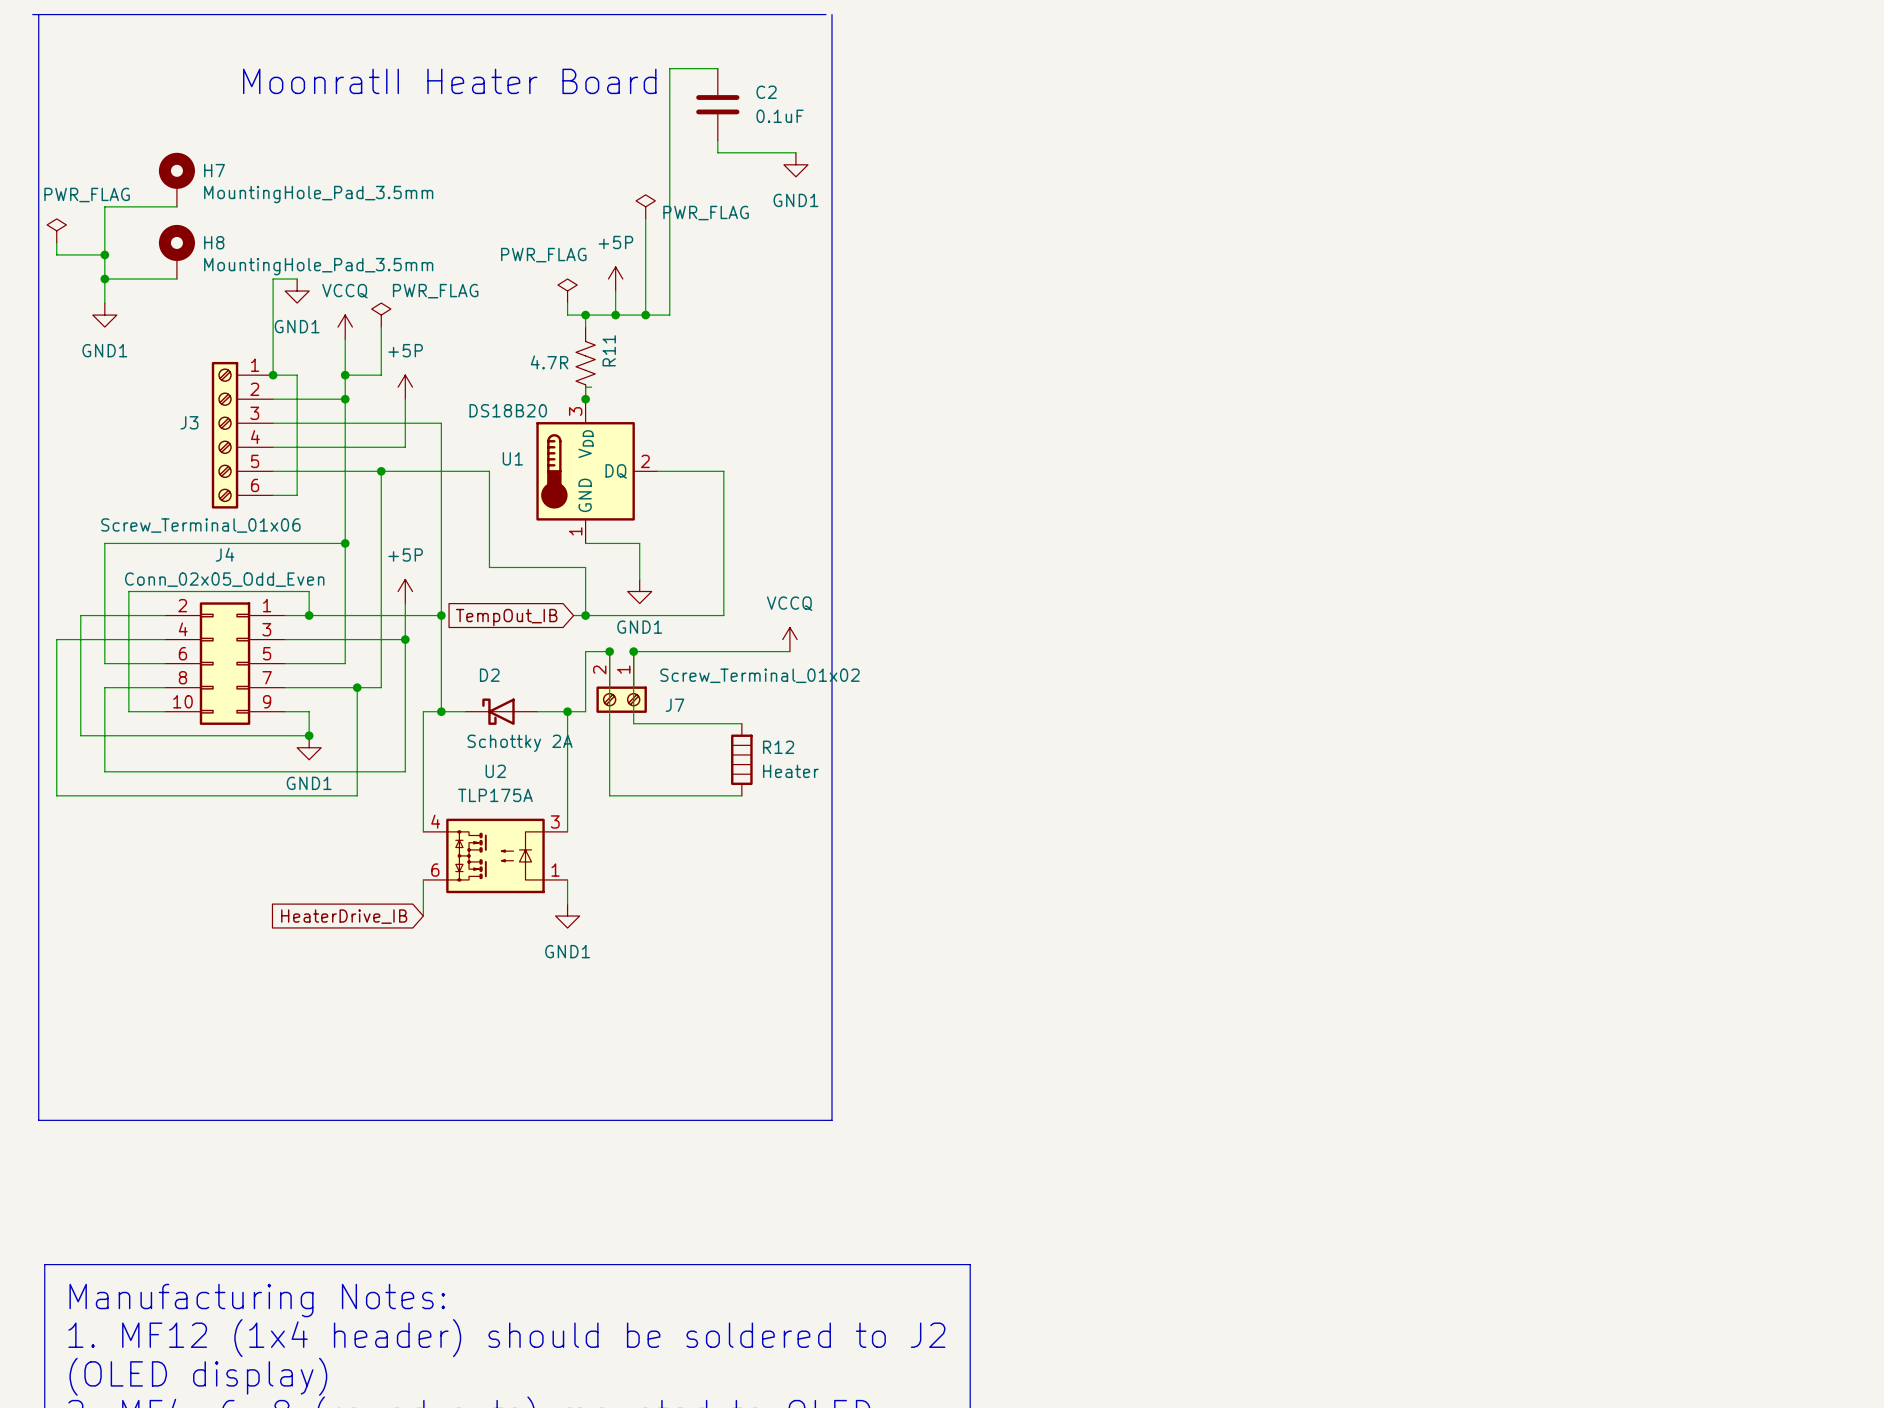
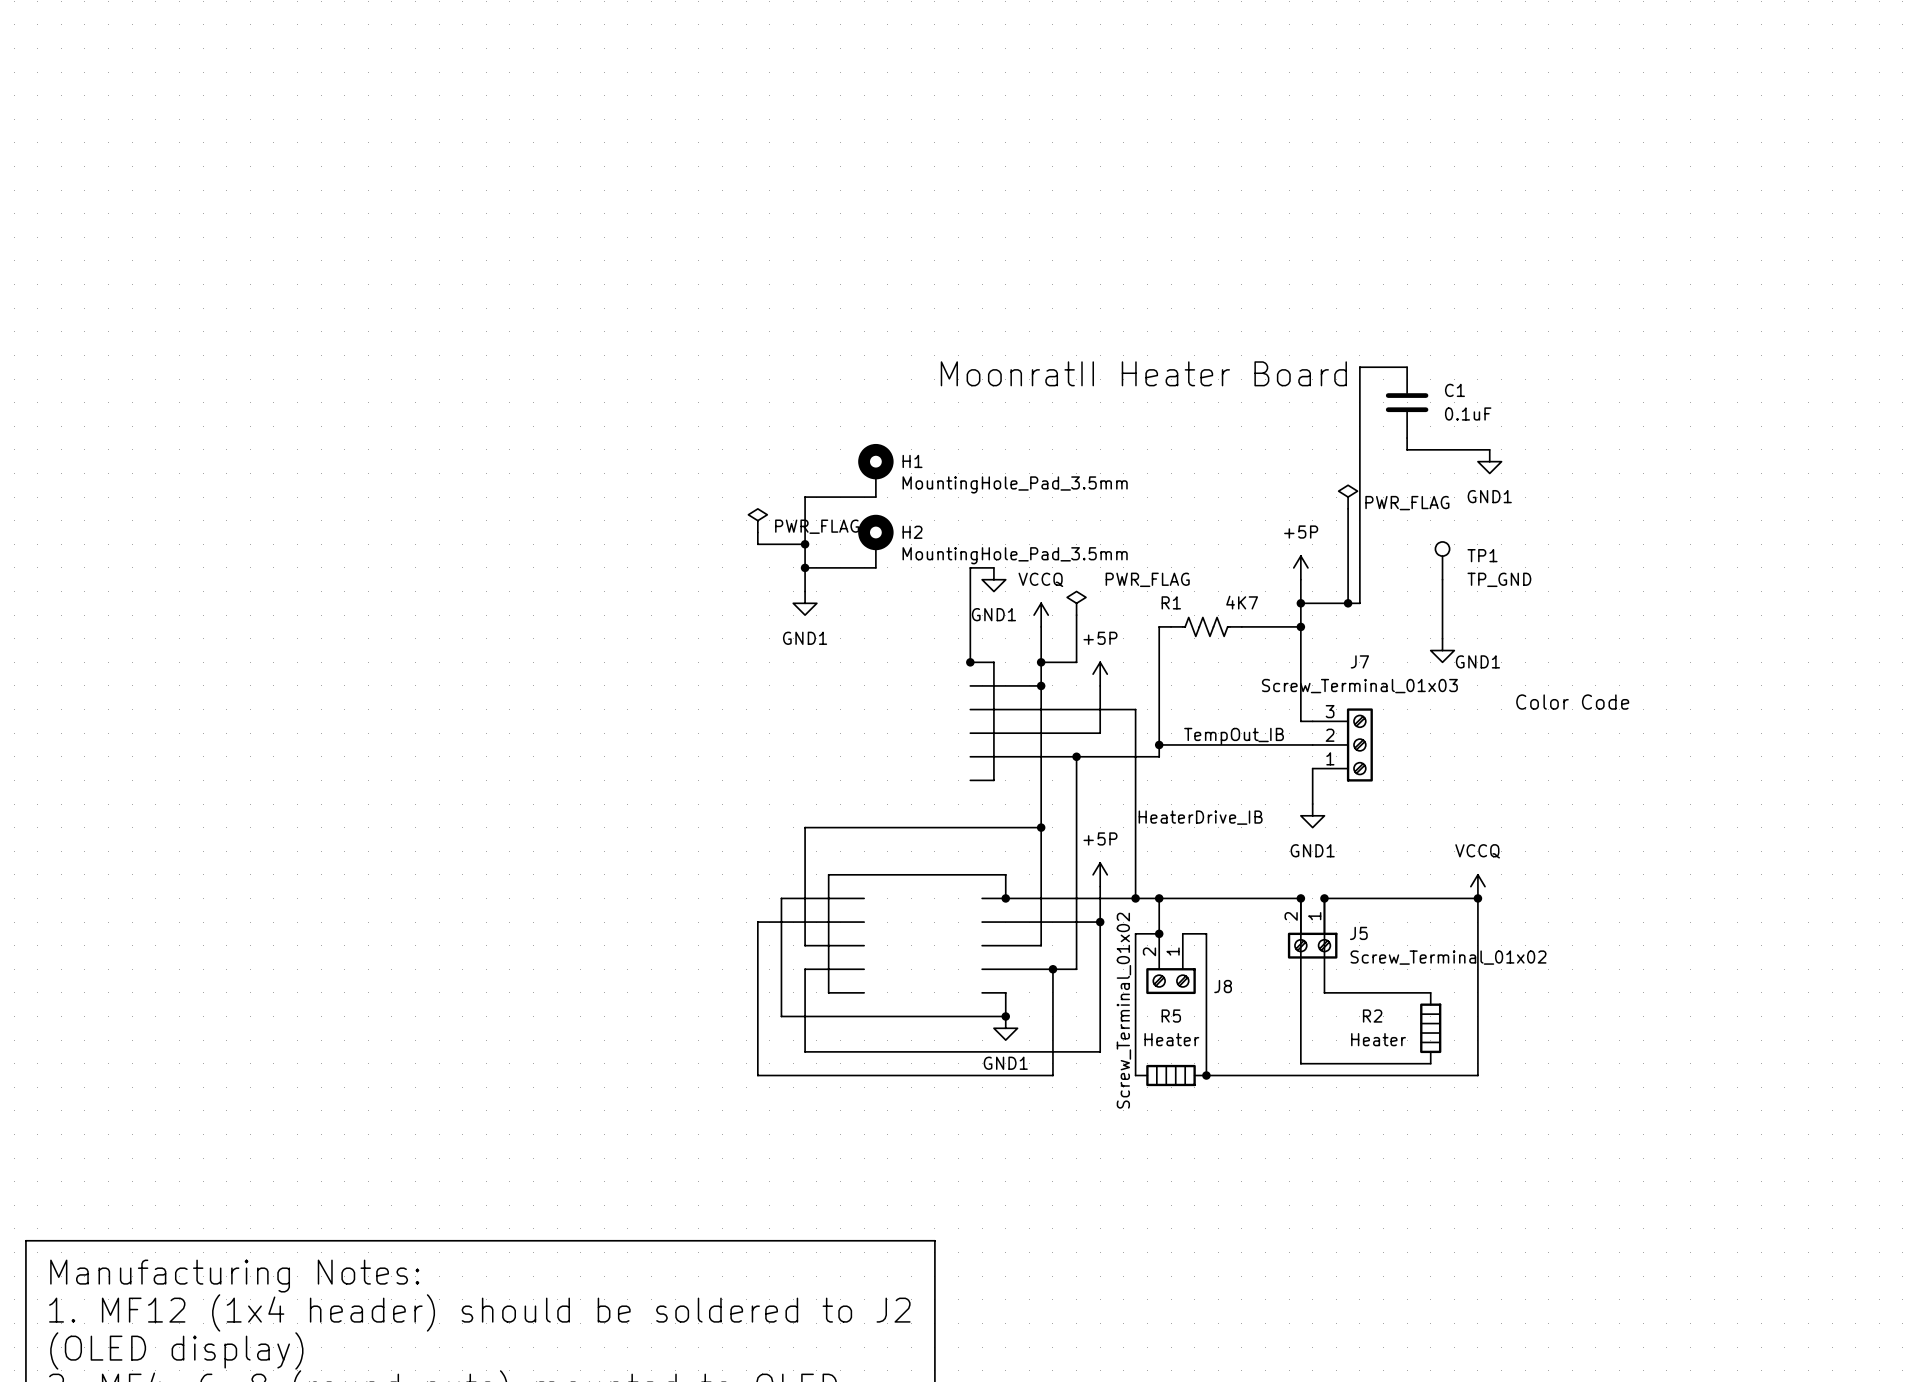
line: (32, 14) (825, 14) -> none
line: (38, 14) (38, 1120) (832, 1120) (832, 14) -> none
wire: (717, 68) (669, 68) (669, 315) (567, 315) (567, 303) -> none
text: MoonratII Heater Board (449, 81) -> none
C2: 0.1uF (717, 104) -> none
wire: (717, 140) (717, 152) (795, 152) -> none
power symbol: GND1 (795, 164) -> none
H7: MountingHole_Pad_3.5mm (176, 179) -> none
wire: (176, 206) (104, 206) (104, 303) -> none
power symbol: PWR_FLAG (645, 206) -> none
wire: (645, 218) (645, 315) -> none
power symbol: PWR_FLAG (56, 230) -> none
wire: (56, 242) (56, 254) (104, 254) -> none
H8: MountingHole_Pad_3.5mm (176, 251) -> none
junction: (104, 254) -> none
wire: (104, 279) (176, 279) -> none
junction: (104, 279) -> none
wire: (297, 279) (273, 279) (273, 375) (297, 375) (297, 495) (273, 495) -> none
power symbol: +5P (615, 279) -> none
power symbol: GND1 (297, 291) -> none
power symbol: PWR_FLAG (567, 291) -> none
wire: (615, 291) (615, 315) -> none
power symbol: GND1 (104, 315) -> none
power symbol: PWR_FLAG (381, 315) -> none
wire: (585, 315) (585, 327) -> none
junction: (585, 315) -> none
junction: (615, 315) -> none
junction: (645, 315) -> none
power symbol: VCCQ (345, 327) -> none
wire: (381, 327) (381, 375) (345, 375) -> none
wire: (345, 339) (345, 663) (285, 663) -> none
R11: 4.7R (585, 363) -> none
junction: (273, 375) -> none
junction: (345, 375) -> none
wire: none -> (1407, 367) (1359, 367) (1359, 603) (1300, 603)
text: none -> MoonratII Heater Board (1143, 373)
power symbol: +5P (405, 387) -> none
wire: (591, 387) (585, 387) (585, 399) -> none
wire: (273, 399) (345, 399) -> none
junction: (345, 399) -> none
wire: (405, 399) (405, 447) (273, 447) -> none
junction: (585, 399) -> none
C1: none -> 0.1uF (1407, 402)
wire: (273, 423) (441, 423) (441, 711) -> none
J3: Screw_Terminal_01x06 (242, 435) -> none
wire: none -> (1407, 438) (1407, 449) (1489, 449)
wire: (273, 471) (489, 471) (489, 567) (585, 567) (585, 615) -> none
wire: (381, 471) (381, 687) (285, 687) -> none
junction: (381, 471) -> none
U1: DS18B20 (597, 471) -> none
wire: (657, 471) (723, 471) (723, 615) (573, 615) -> none
power symbol: none -> GND1 (1489, 461)
H1: none -> MountingHole_Pad_3.5mm (875, 470)
wire: none -> (875, 497) (805, 497) (805, 591)
power symbol: none -> PWR_FLAG (1348, 497)
wire: none -> (1348, 508) (1348, 603)
power symbol: none -> PWR_FLAG (757, 520)
wire: (345, 543) (104, 543) (104, 663) (164, 663) -> none
junction: (345, 543) -> none
wire: (585, 543) (639, 543) (639, 579) -> none
wire: none -> (757, 532) (757, 544) (805, 544)
H2: none -> MountingHole_Pad_3.5mm (875, 541)
junction: none -> (805, 544)
TP1: none -> TP_GND (1442, 560)
wire: none -> (805, 567) (875, 567)
junction: none -> (805, 567)
wire: none -> (993, 567) (970, 567) (970, 662) (993, 662) (993, 780) (970, 780)
power symbol: none -> +5P (1300, 567)
power symbol: +5P (405, 591) -> none
power symbol: GND1 (639, 591) -> none
power symbol: none -> GND1 (993, 579)
wire: none -> (1300, 579) (1300, 721) (1312, 721)
wire: none -> (1442, 579) (1442, 638)
wire: (405, 603) (405, 771) (104, 771) (104, 687) (164, 687) -> none
wire: (164, 615) (80, 615) (80, 735) (309, 735) (309, 711) (285, 711) -> none
wire: (285, 615) (441, 615) -> none
wire: (309, 615) (309, 591) (128, 591) (128, 711) (164, 711) -> none
junction: (309, 615) -> none
junction: (441, 615) -> none
junction: (585, 615) -> none
power symbol: none -> GND1 (805, 603)
power symbol: none -> PWR_FLAG (1076, 603)
junction: none -> (1300, 603)
junction: none -> (1348, 603)
global label: TempOut_IB (506, 617) -> none
power symbol: none -> VCCQ (1041, 615)
wire: none -> (1076, 615) (1076, 662) (1041, 662)
wire: (164, 639) (56, 639) (56, 795) (357, 795) (357, 687) -> none
wire: (285, 639) (405, 639) -> none
junction: (405, 639) -> none
power symbol: VCCQ (789, 639) -> none
wire: none -> (1041, 626) (1041, 945) (982, 945)
wire: none -> (1171, 626) (1159, 626) (1159, 756) (970, 756)
R1: none -> 4K7 (1206, 626)
wire: none -> (1241, 626) (1300, 626)
junction: none -> (1300, 626)
J7 symbol: [596, 651, 647, 713] -> [1312, 708, 1373, 782]
junction: (609, 651) -> none
junction: (633, 651) -> none
wire: (789, 651) (633, 651) (633, 723) (741, 723) -> none
J4: Conn_02x05_Odd_Even (225, 663) -> none
power symbol: none -> GND1 (1442, 650)
J7 value: Screw_Terminal_01x02 (759, 675) -> Screw_Terminal_01x03 (1359, 686)
junction: none -> (970, 662)
junction: none -> (1041, 662)
junction: (357, 687) -> none
power symbol: none -> +5P (1100, 674)
wire: none -> (970, 685) (1041, 685)
junction: none -> (1041, 685)
wire: none -> (1100, 685) (1100, 733) (970, 733)
J7 name position: J7 (674, 705) -> J7 (1359, 661)
junction: (441, 711) -> none
wire: (465, 711) (423, 711) (423, 831) -> none
D2: Schottky 2A (501, 711) -> none
wire: (537, 711) (585, 711) (585, 651) (609, 651) (609, 795) (741, 795) -> none
wire: (567, 711) (567, 831) -> none
junction: (567, 711) -> none
text: none -> Color Code (1572, 702)
wire: none -> (970, 709) (1135, 709) (1135, 898)
junction: (309, 735) -> none
power symbol: GND1 (309, 747) -> none
label: none -> TempOut_IB (1234, 736)
R12: Heater (741, 759) -> none
wire: none -> (1159, 744) (1312, 744)
junction: none -> (1159, 744)
wire: none -> (1076, 756) (1076, 969) (982, 969)
junction: none -> (1076, 756)
wire: none -> (1312, 768) (1312, 804)
power symbol: none -> GND1 (1312, 815)
label: none -> HeaterDrive_IB (1200, 817)
wire: none -> (1041, 827) (805, 827) (805, 945) (864, 945)
junction: none -> (1041, 827)
U2: TLP175A (495, 855) -> none
wire: (423, 879) (423, 916) -> none
wire: (567, 879) (567, 904) -> none
power symbol: none -> +5P (1100, 874)
wire: none -> (1100, 886) (1100, 1051) (805, 1051) (805, 969) (864, 969)
power symbol: none -> VCCQ (1477, 886)
global label: HeaterDrive_IB (344, 916) -> none
power symbol: GND1 (567, 916) -> none
wire: none -> (864, 898) (781, 898) (781, 1016) (1005, 1016) (1005, 992) (982, 992)
wire: none -> (982, 898) (1300, 898) (1300, 1063) (1430, 1063)
wire: none -> (1005, 898) (1005, 874) (828, 874) (828, 992) (864, 992)
junction: none -> (1005, 898)
junction: none -> (1135, 898)
wire: none -> (1159, 898) (1159, 933) (1135, 933) (1135, 1075)
junction: none -> (1159, 898)
junction: none -> (1300, 898)
junction: none -> (1324, 898)
junction: none -> (1477, 898)
wire: none -> (864, 922) (757, 922) (757, 1075) (1052, 1075) (1052, 969)
wire: none -> (982, 922) (1100, 922)
junction: none -> (1100, 922)
J5: none -> Screw_Terminal_01x02 (1312, 928)
junction: none -> (1159, 933)
wire: none -> (1182, 933) (1206, 933) (1206, 1075) (1477, 1075) (1477, 898) (1324, 898) (1324, 992) (1430, 992)
J8: none -> Screw_Terminal_01x02 (1171, 963)
junction: none -> (1052, 969)
junction: none -> (1005, 1016)
power symbol: none -> GND1 (1005, 1028)
R2: none -> Heater (1430, 1028)
R5: none -> Heater (1171, 1075)
junction: none -> (1206, 1075)

